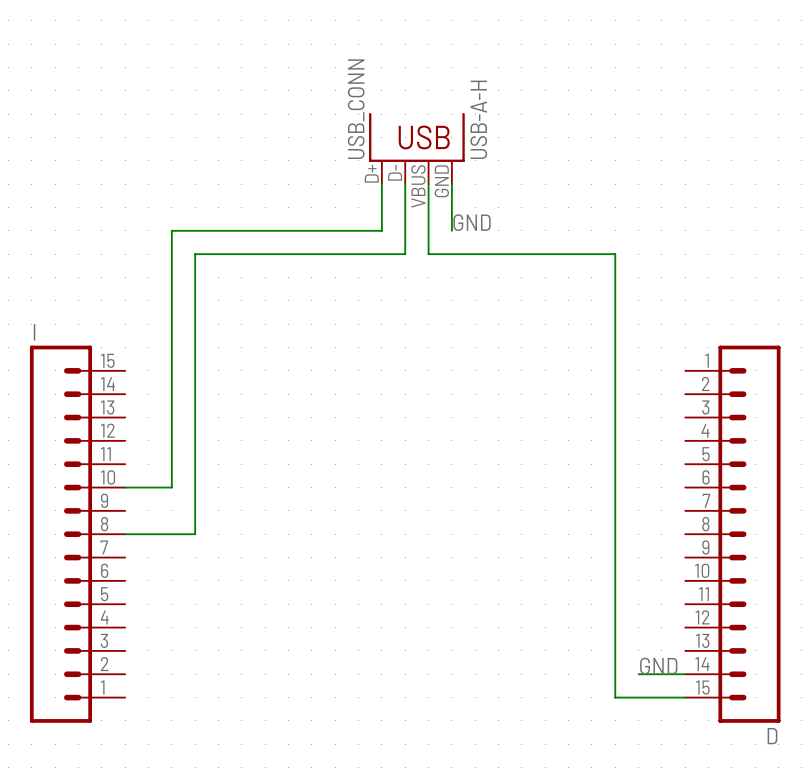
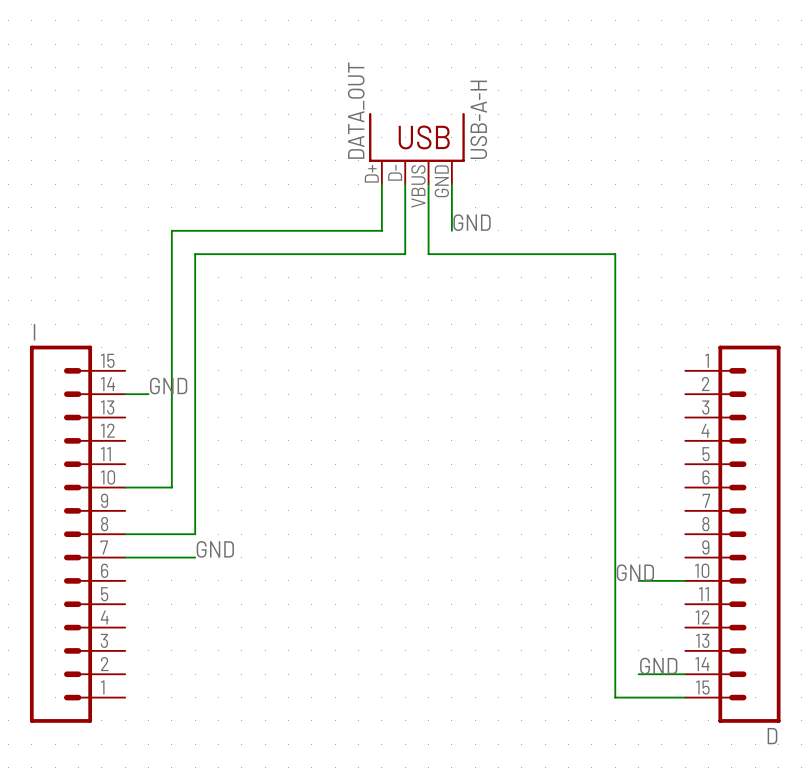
USB_CONN name: USB_CONN (356, 109) -> DATA_OUT (356, 110)
label: none -> GND (168, 386)
wire: none -> (125, 394) (148, 394)
label: none -> GND (215, 549)
wire: none -> (125, 557) (195, 557)
label: none -> GND (635, 572)
wire: none -> (638, 580) (685, 580)

